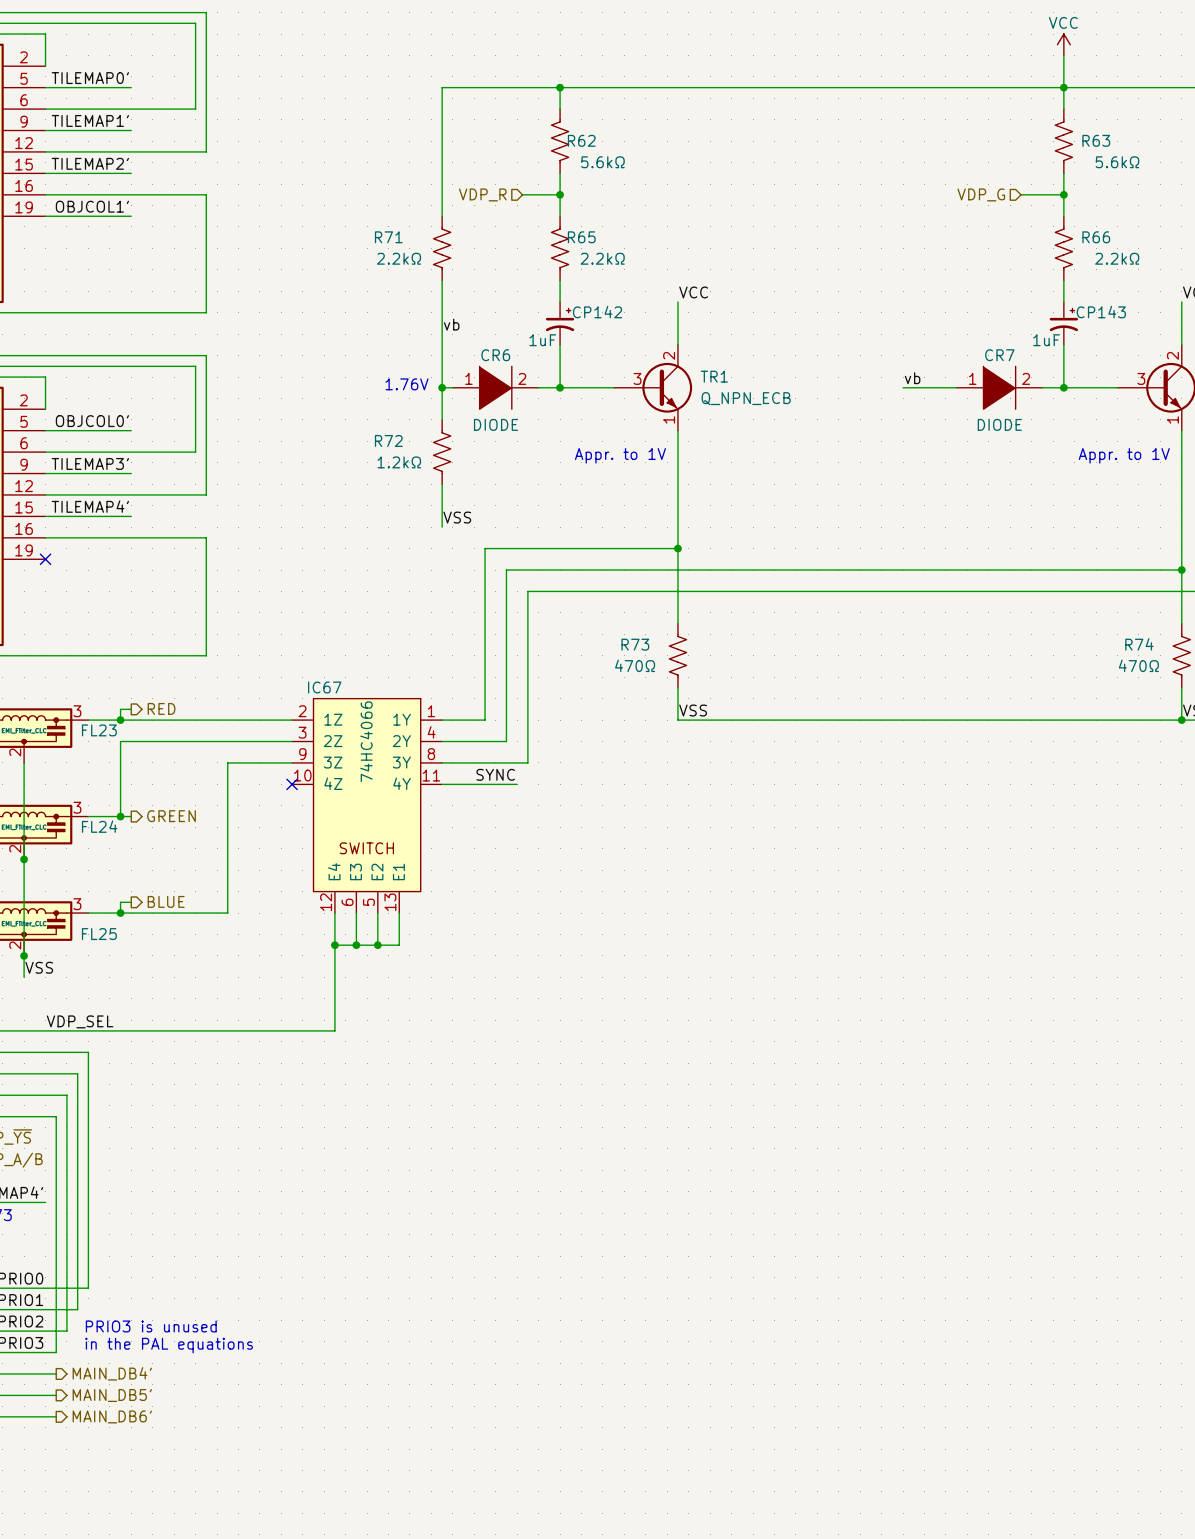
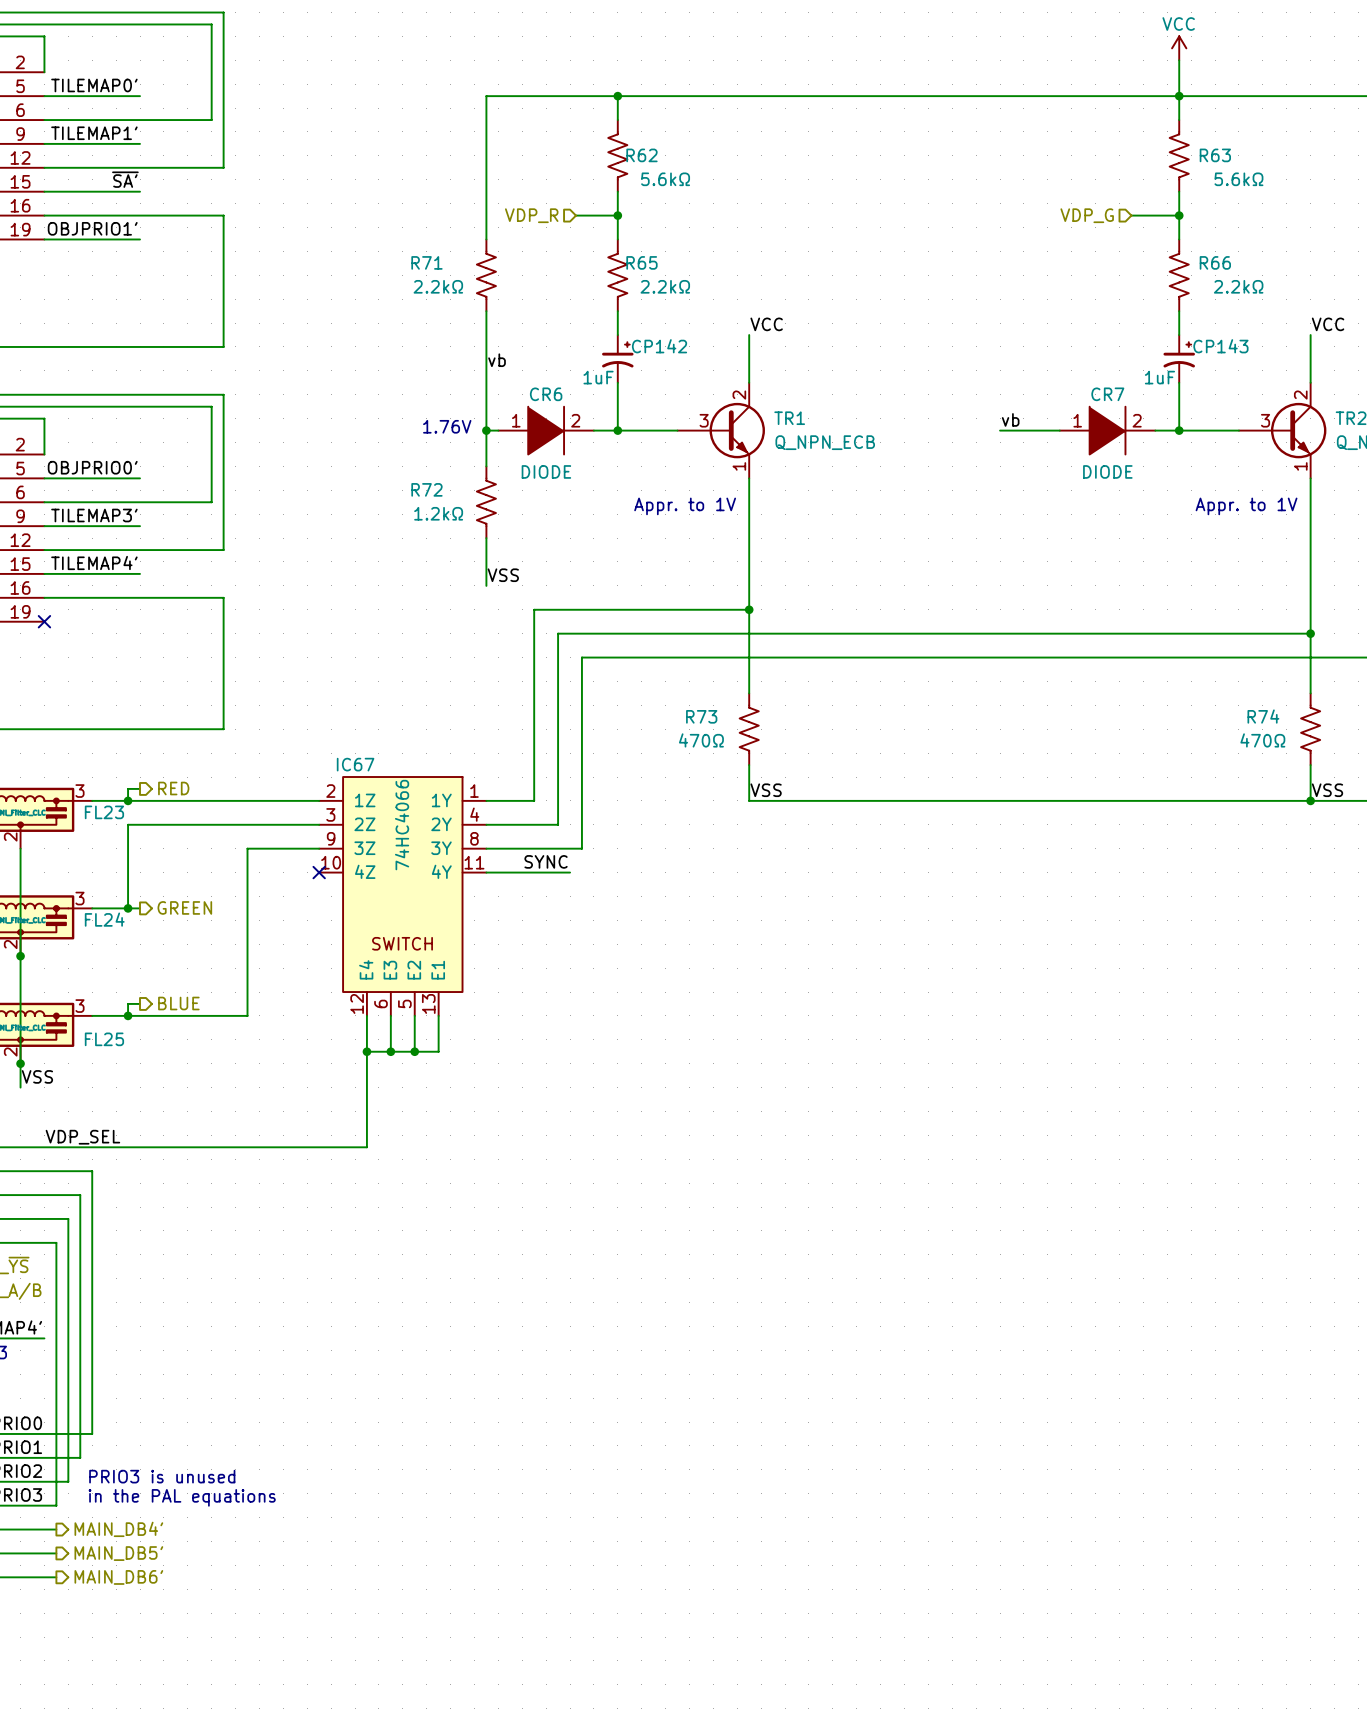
label: TILEMAP2' (90, 163) -> ~{SA'} (125, 179)
label: OBJCOL1' (92, 206) -> OBJPRIO1' (92, 228)
label: OBJCOL0' (92, 421) -> OBJPRIO0' (92, 467)

